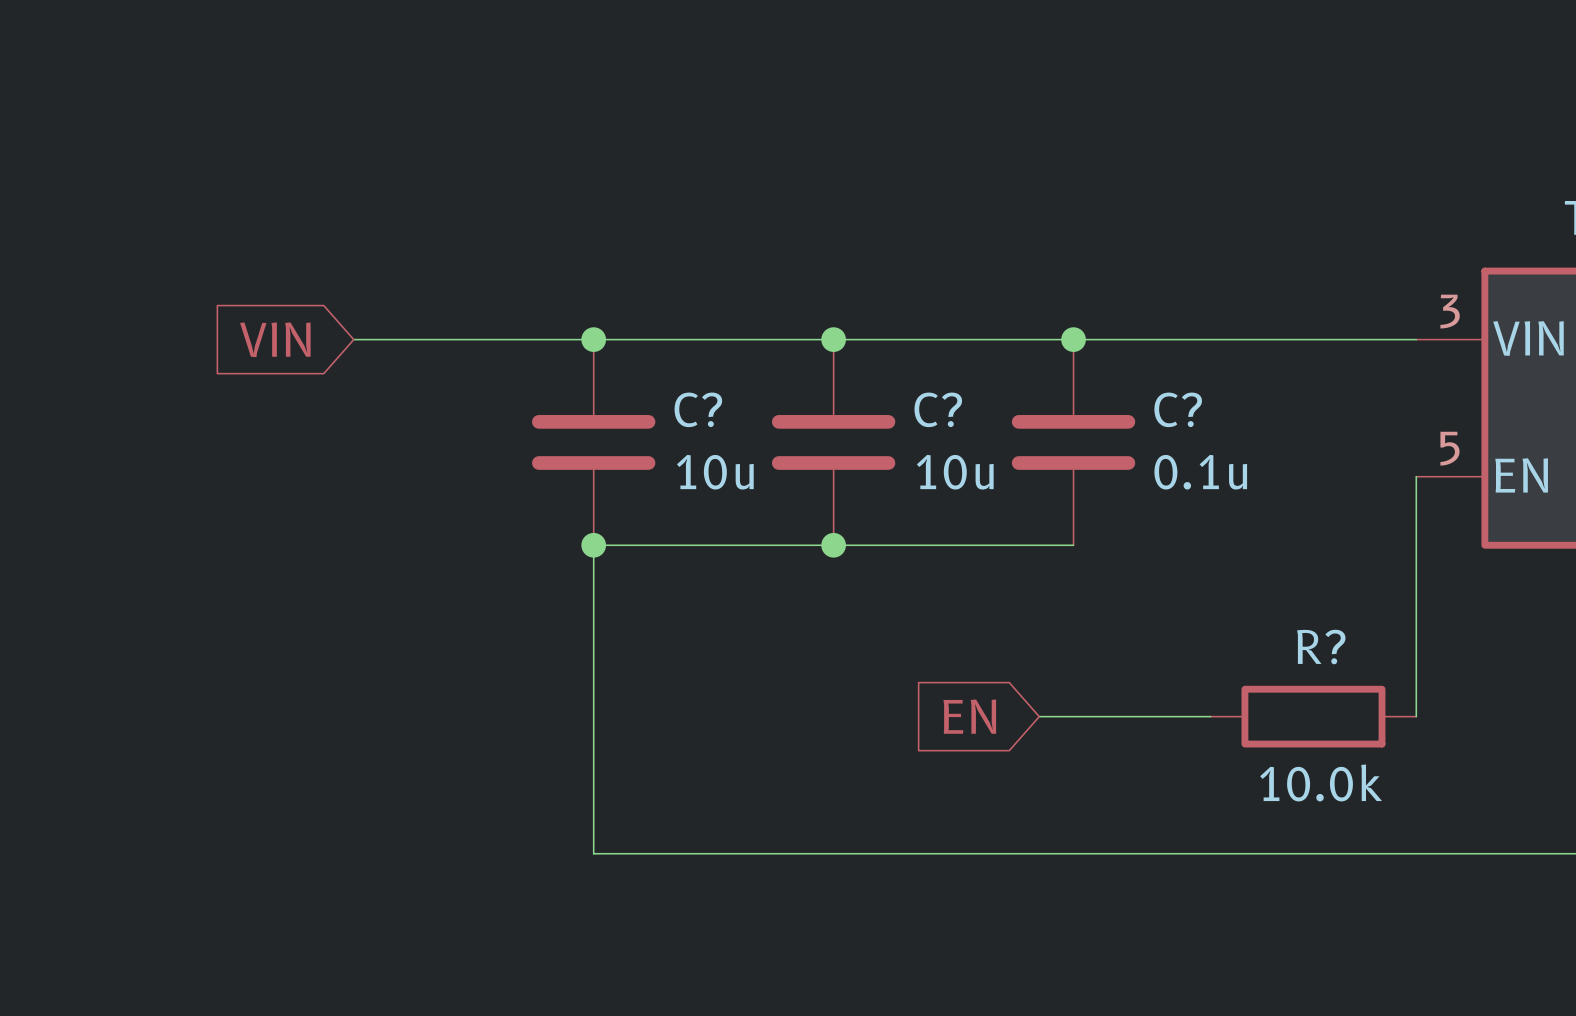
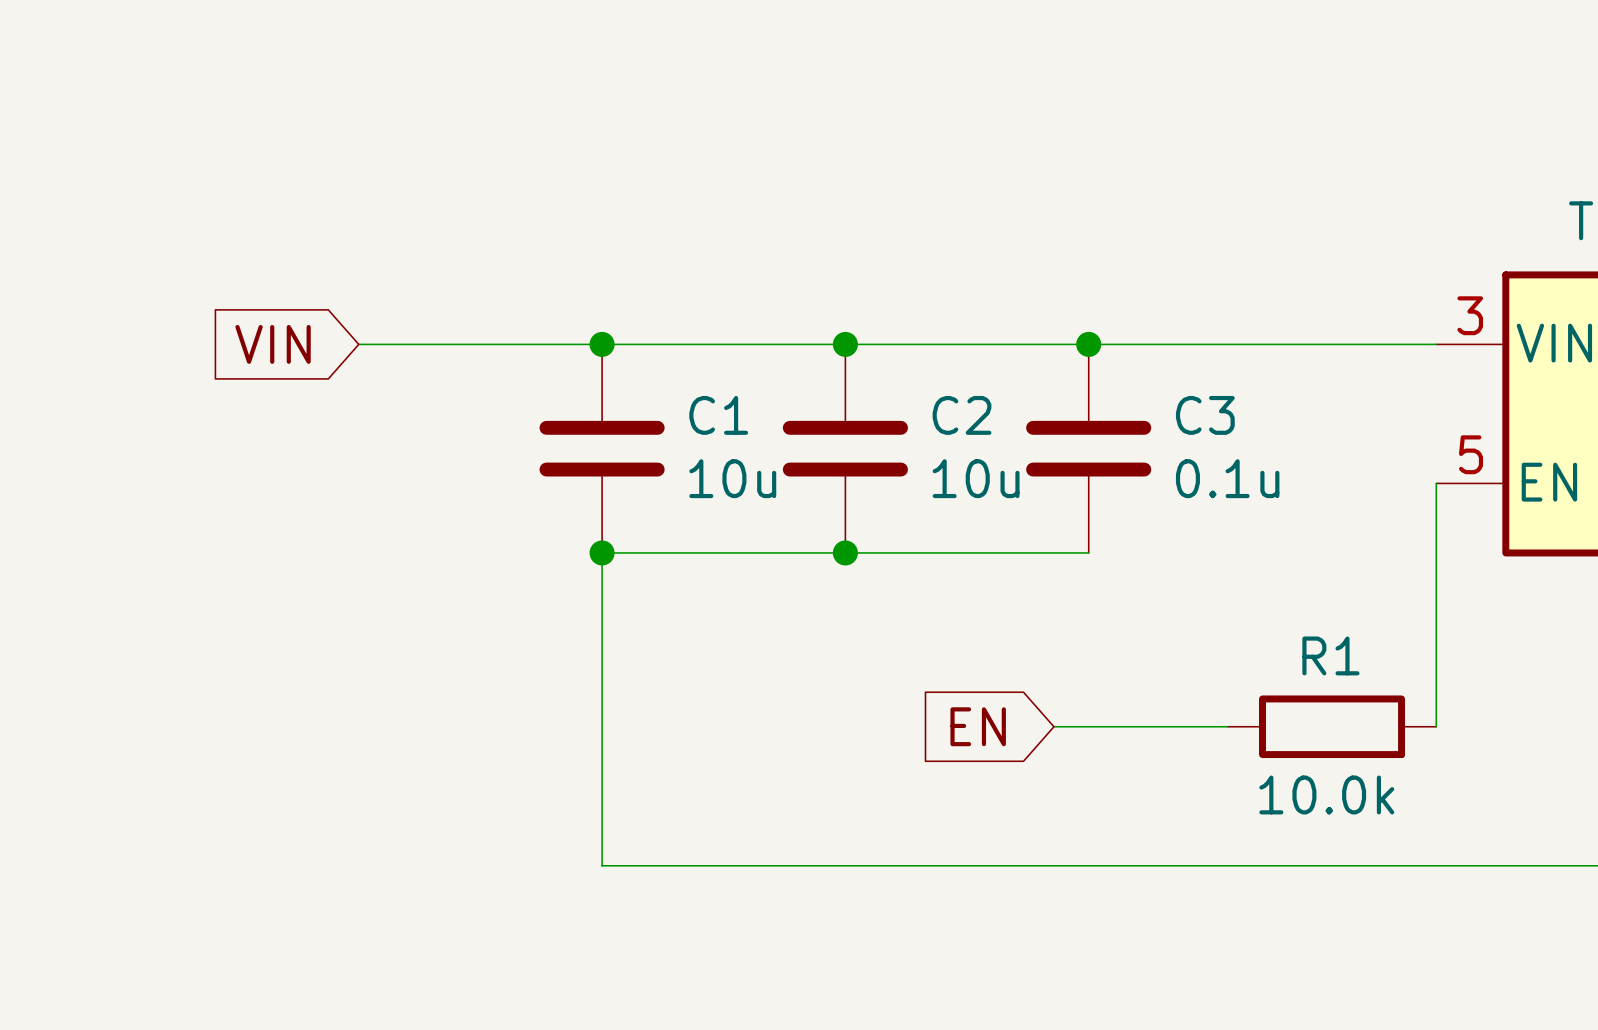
C? name: C? (698, 409) -> C1 (718, 415)
C? name: C? (938, 409) -> C2 (962, 415)
C? name: C? (1178, 409) -> C3 (1205, 415)
R? name: R? (1321, 647) -> R1 (1330, 655)

